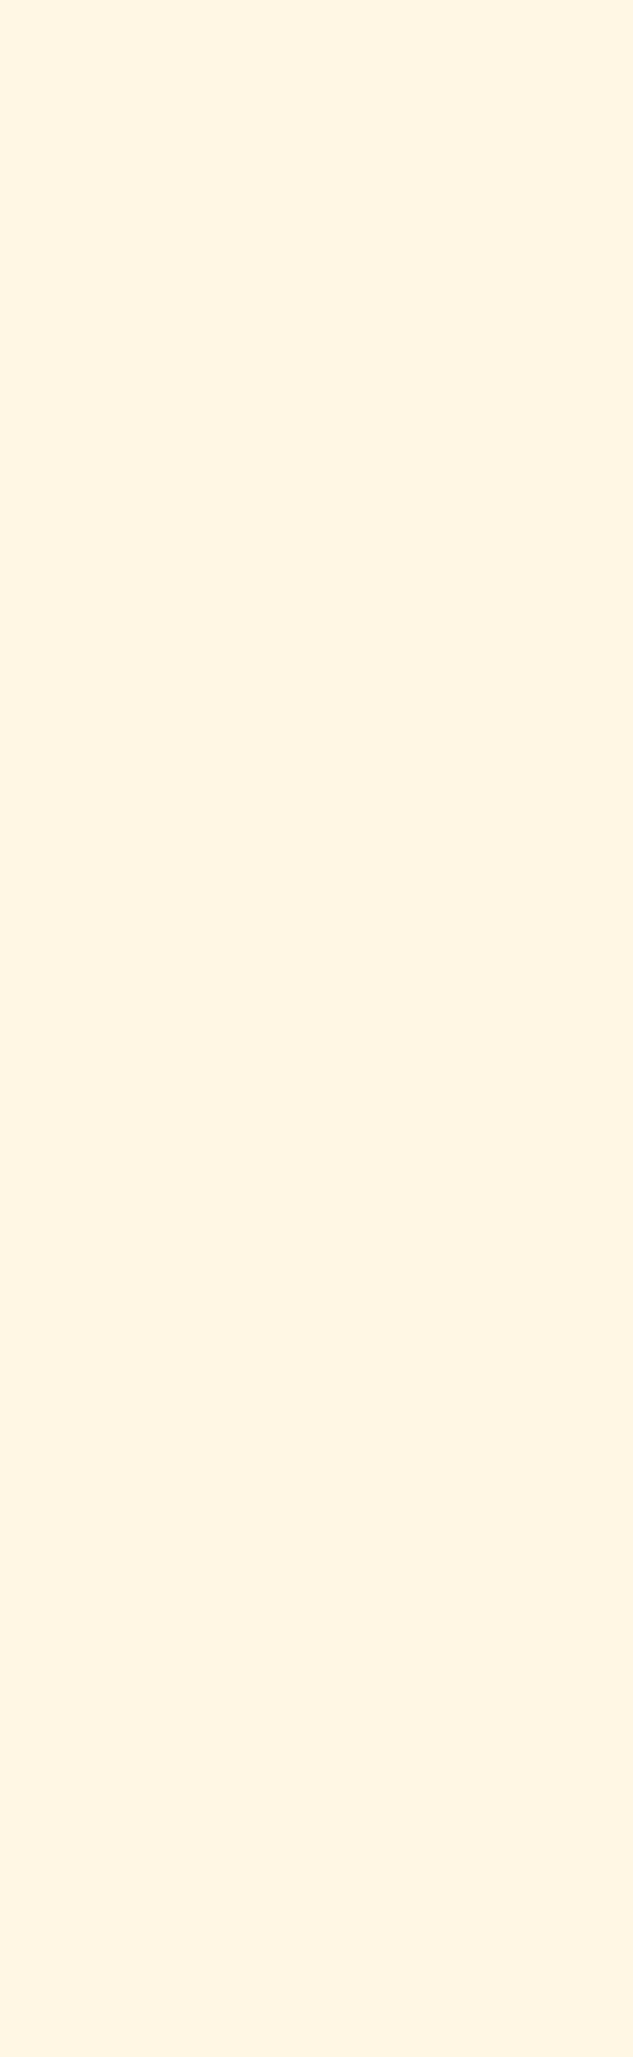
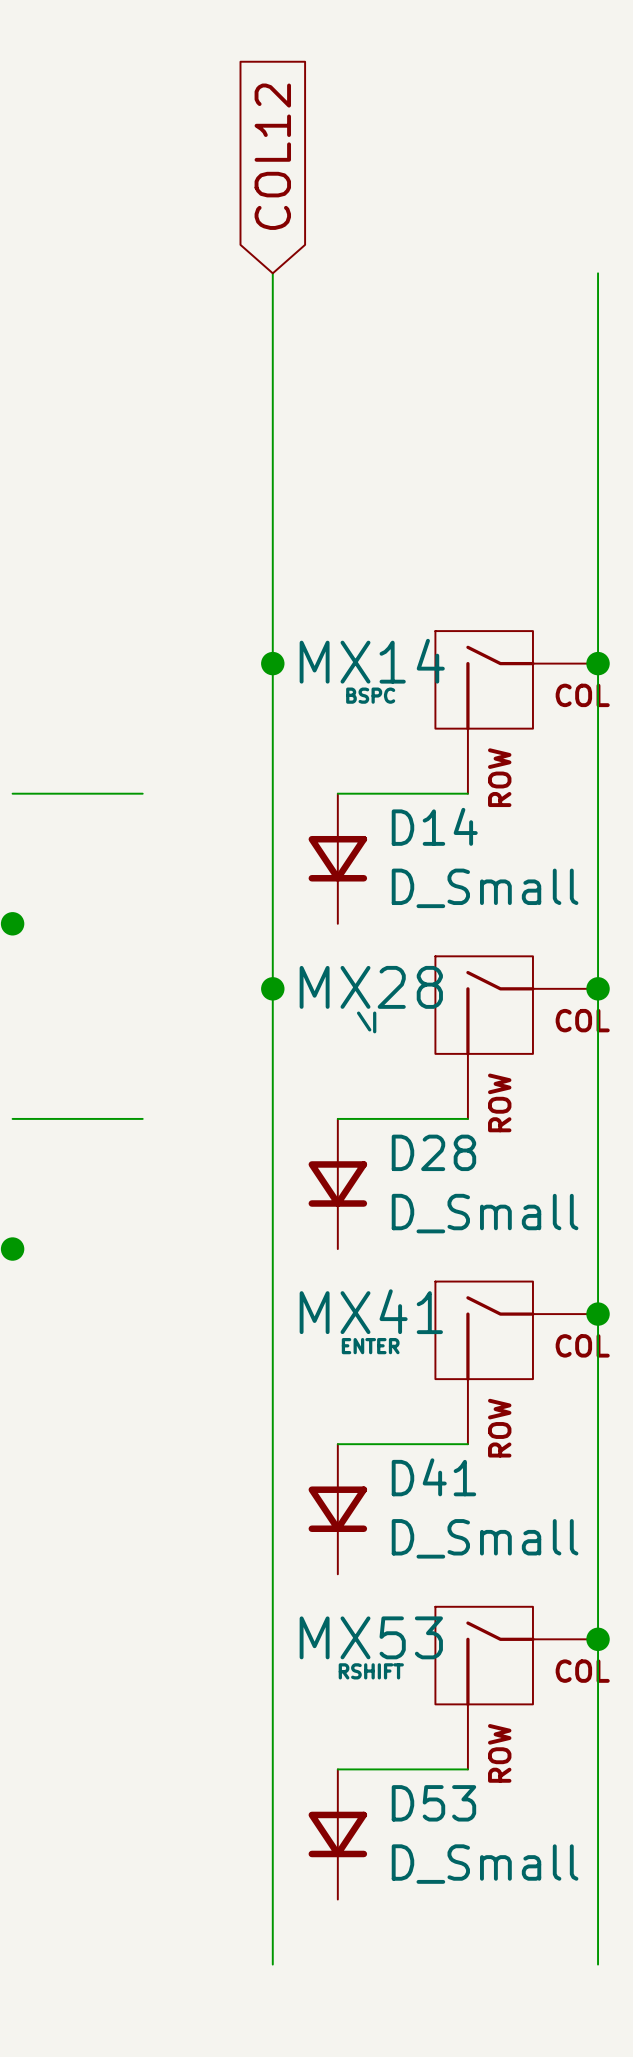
global label: none -> COL12 (272, 156)
wire: none -> (272, 273) (272, 1964)
wire: none -> (598, 273) (598, 1964)
junction: none -> (272, 663)
junction: none -> (598, 663)
MX14: none -> BSPC (516, 712)
wire: none -> (12, 793) (142, 793)
wire: none -> (337, 793) (467, 793)
D14: none -> D_Small (337, 858)
junction: none -> (12, 923)
junction: none -> (272, 988)
junction: none -> (598, 988)
MX28: none -> \| (516, 1037)
wire: none -> (12, 1118) (142, 1118)
wire: none -> (337, 1118) (467, 1118)
D28: none -> D_Small (337, 1183)
junction: none -> (12, 1249)
junction: none -> (598, 1314)
MX41: none -> ENTER (516, 1362)
wire: none -> (337, 1444) (467, 1444)
D41: none -> D_Small (337, 1509)
junction: none -> (598, 1639)
MX53: none -> RSHIFT (516, 1688)
wire: none -> (337, 1769) (467, 1769)
D53: none -> D_Small (337, 1834)

